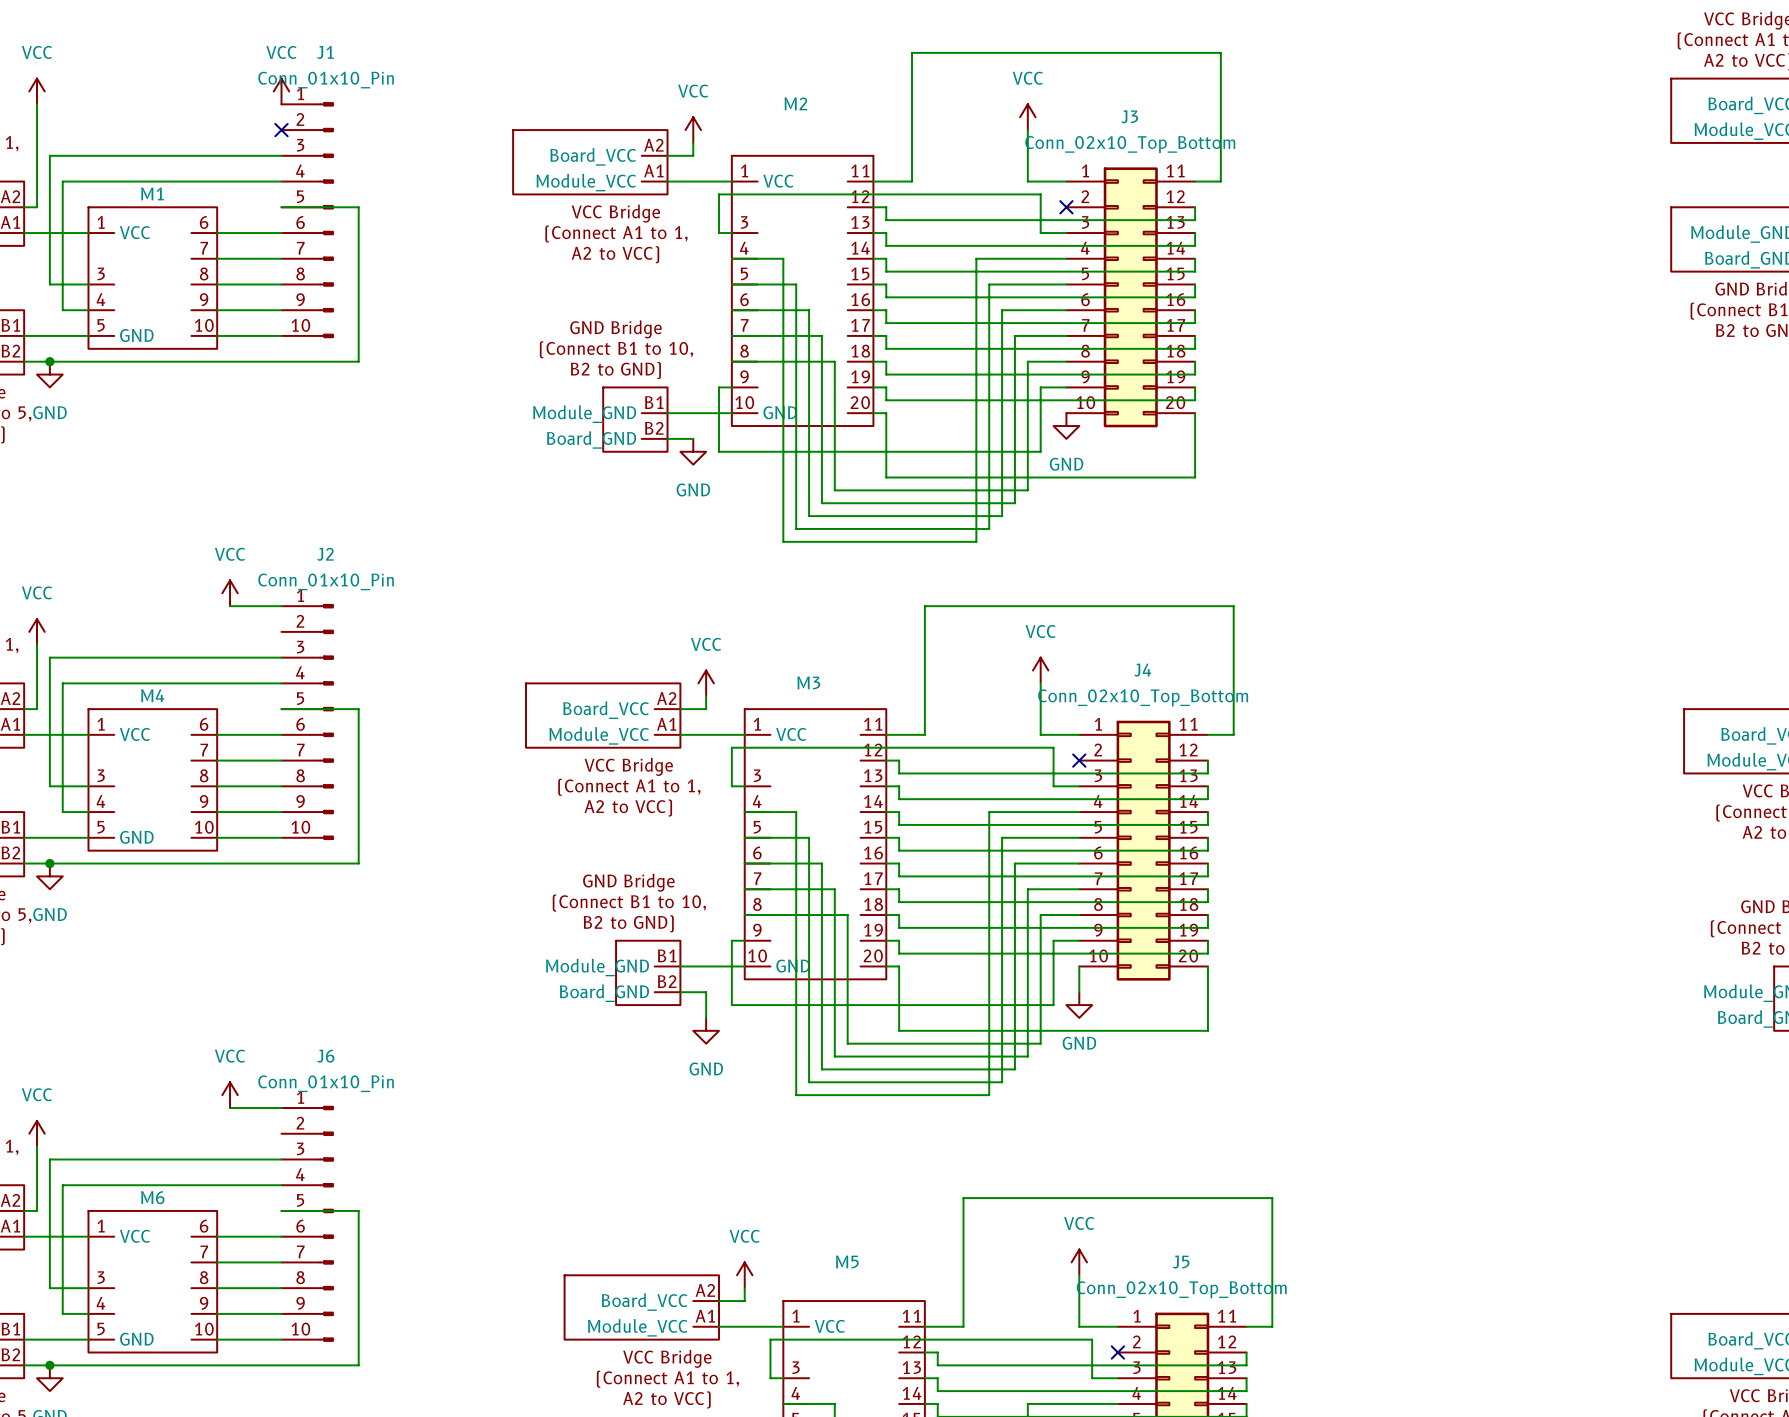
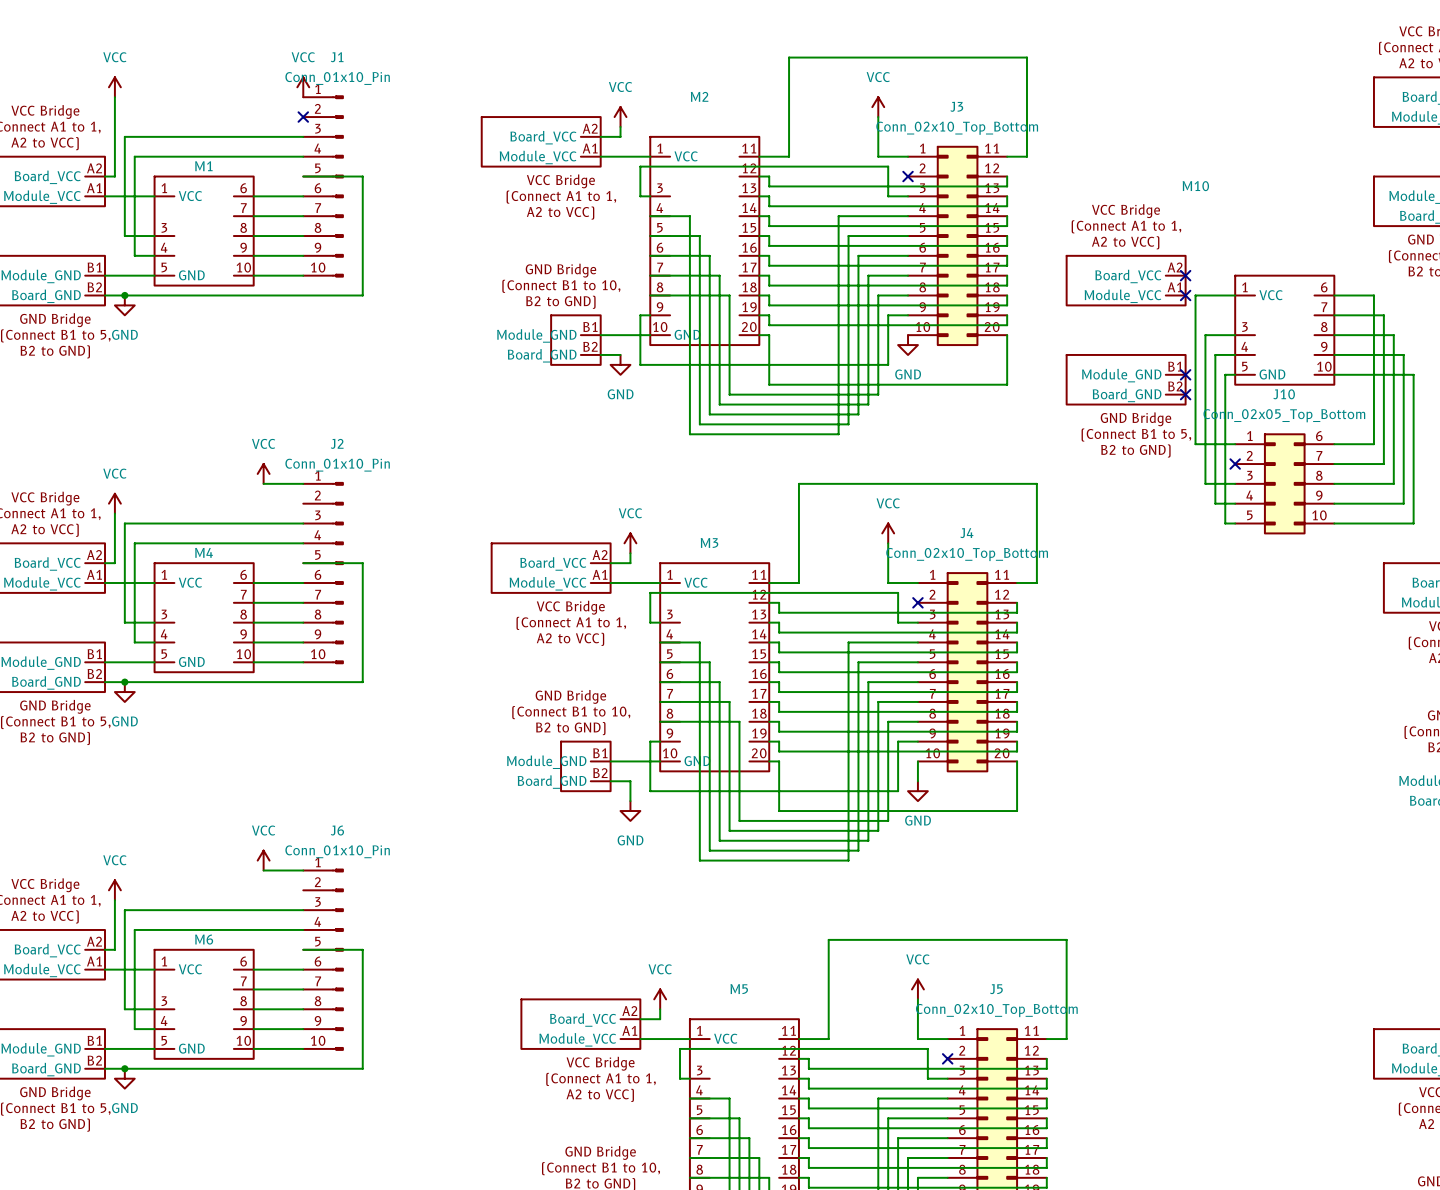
no-connect mark: none -> (1185, 275)
no-connect mark: none -> (1185, 295)
wire: none -> (1235, 295) (1195, 295) (1195, 444) (1235, 444)
wire: none -> (1334, 295) (1373, 295) (1373, 444) (1334, 444)
wire: none -> (1334, 315) (1383, 315) (1383, 464) (1334, 464)
M10: none -> (1200, 330)
wire: none -> (1235, 335) (1205, 335) (1205, 483) (1235, 483)
wire: none -> (1334, 335) (1393, 335) (1393, 483) (1334, 483)
wire: none -> (1235, 354) (1215, 354) (1215, 503) (1235, 503)
wire: none -> (1334, 354) (1403, 354) (1403, 503) (1334, 503)
no-connect mark: none -> (1185, 374)
wire: none -> (1235, 374) (1225, 374) (1225, 523) (1235, 523)
wire: none -> (1334, 374) (1413, 374) (1413, 523) (1334, 523)
no-connect mark: none -> (1185, 394)
no-connect mark: none -> (1235, 464)
J10: none -> Conn_02x05_Top_Bottom (1284, 483)

